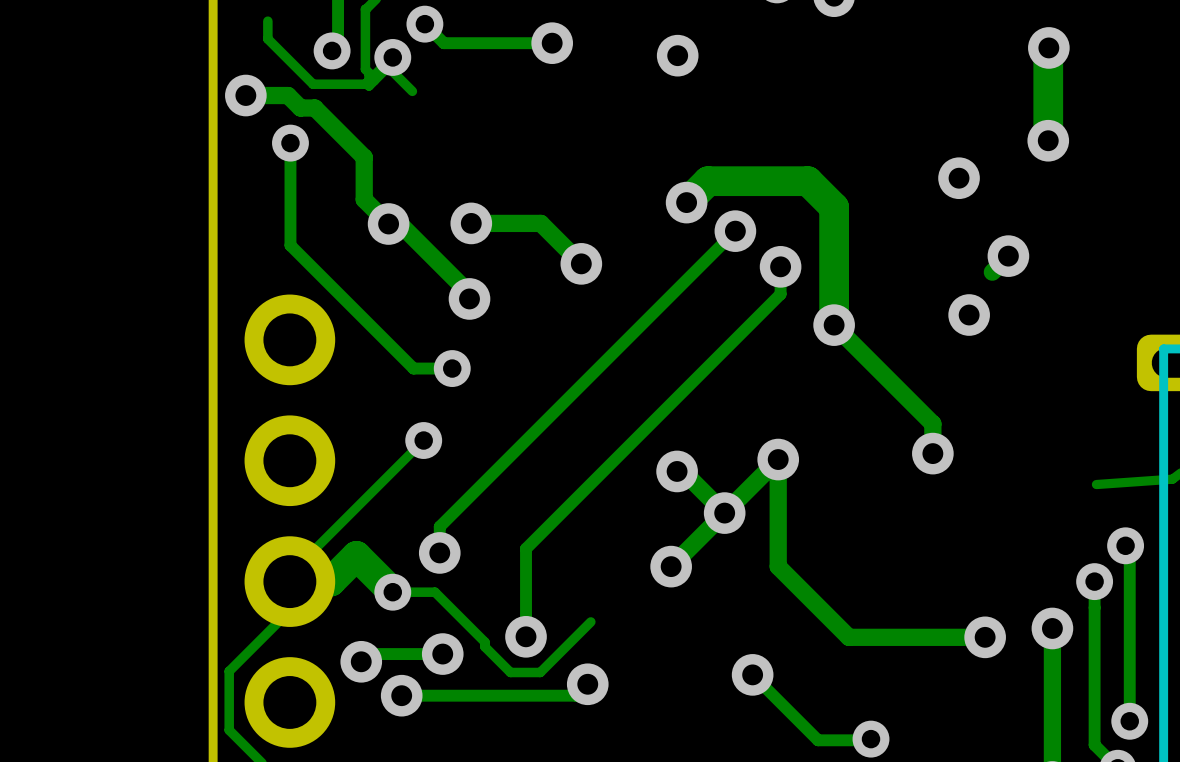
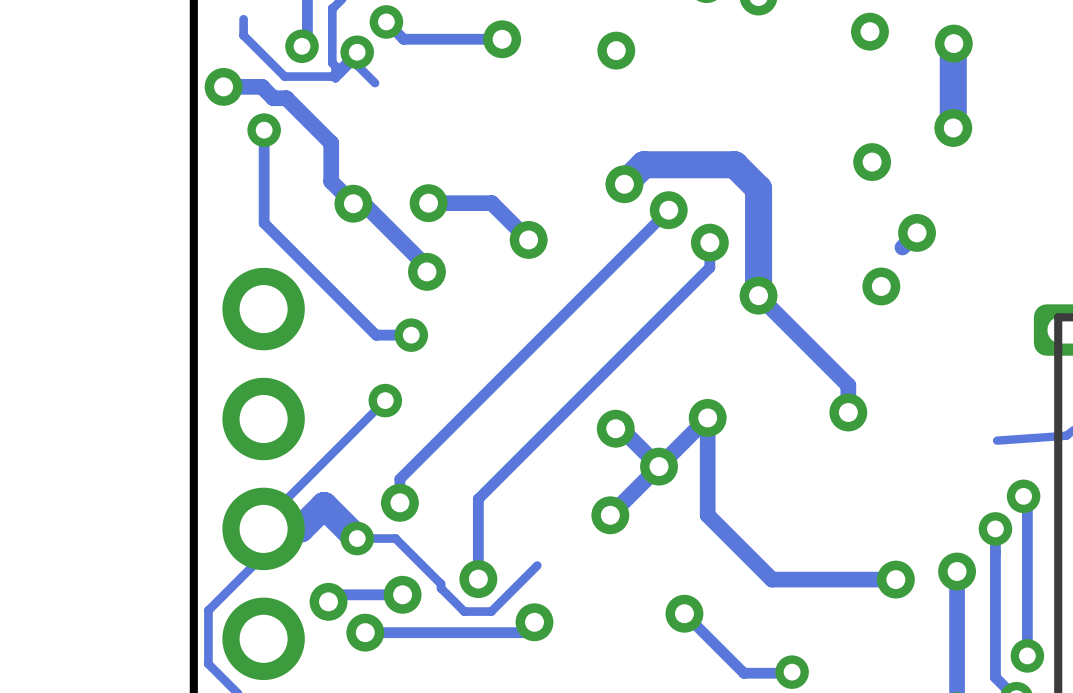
via: none -> (869, 31)

